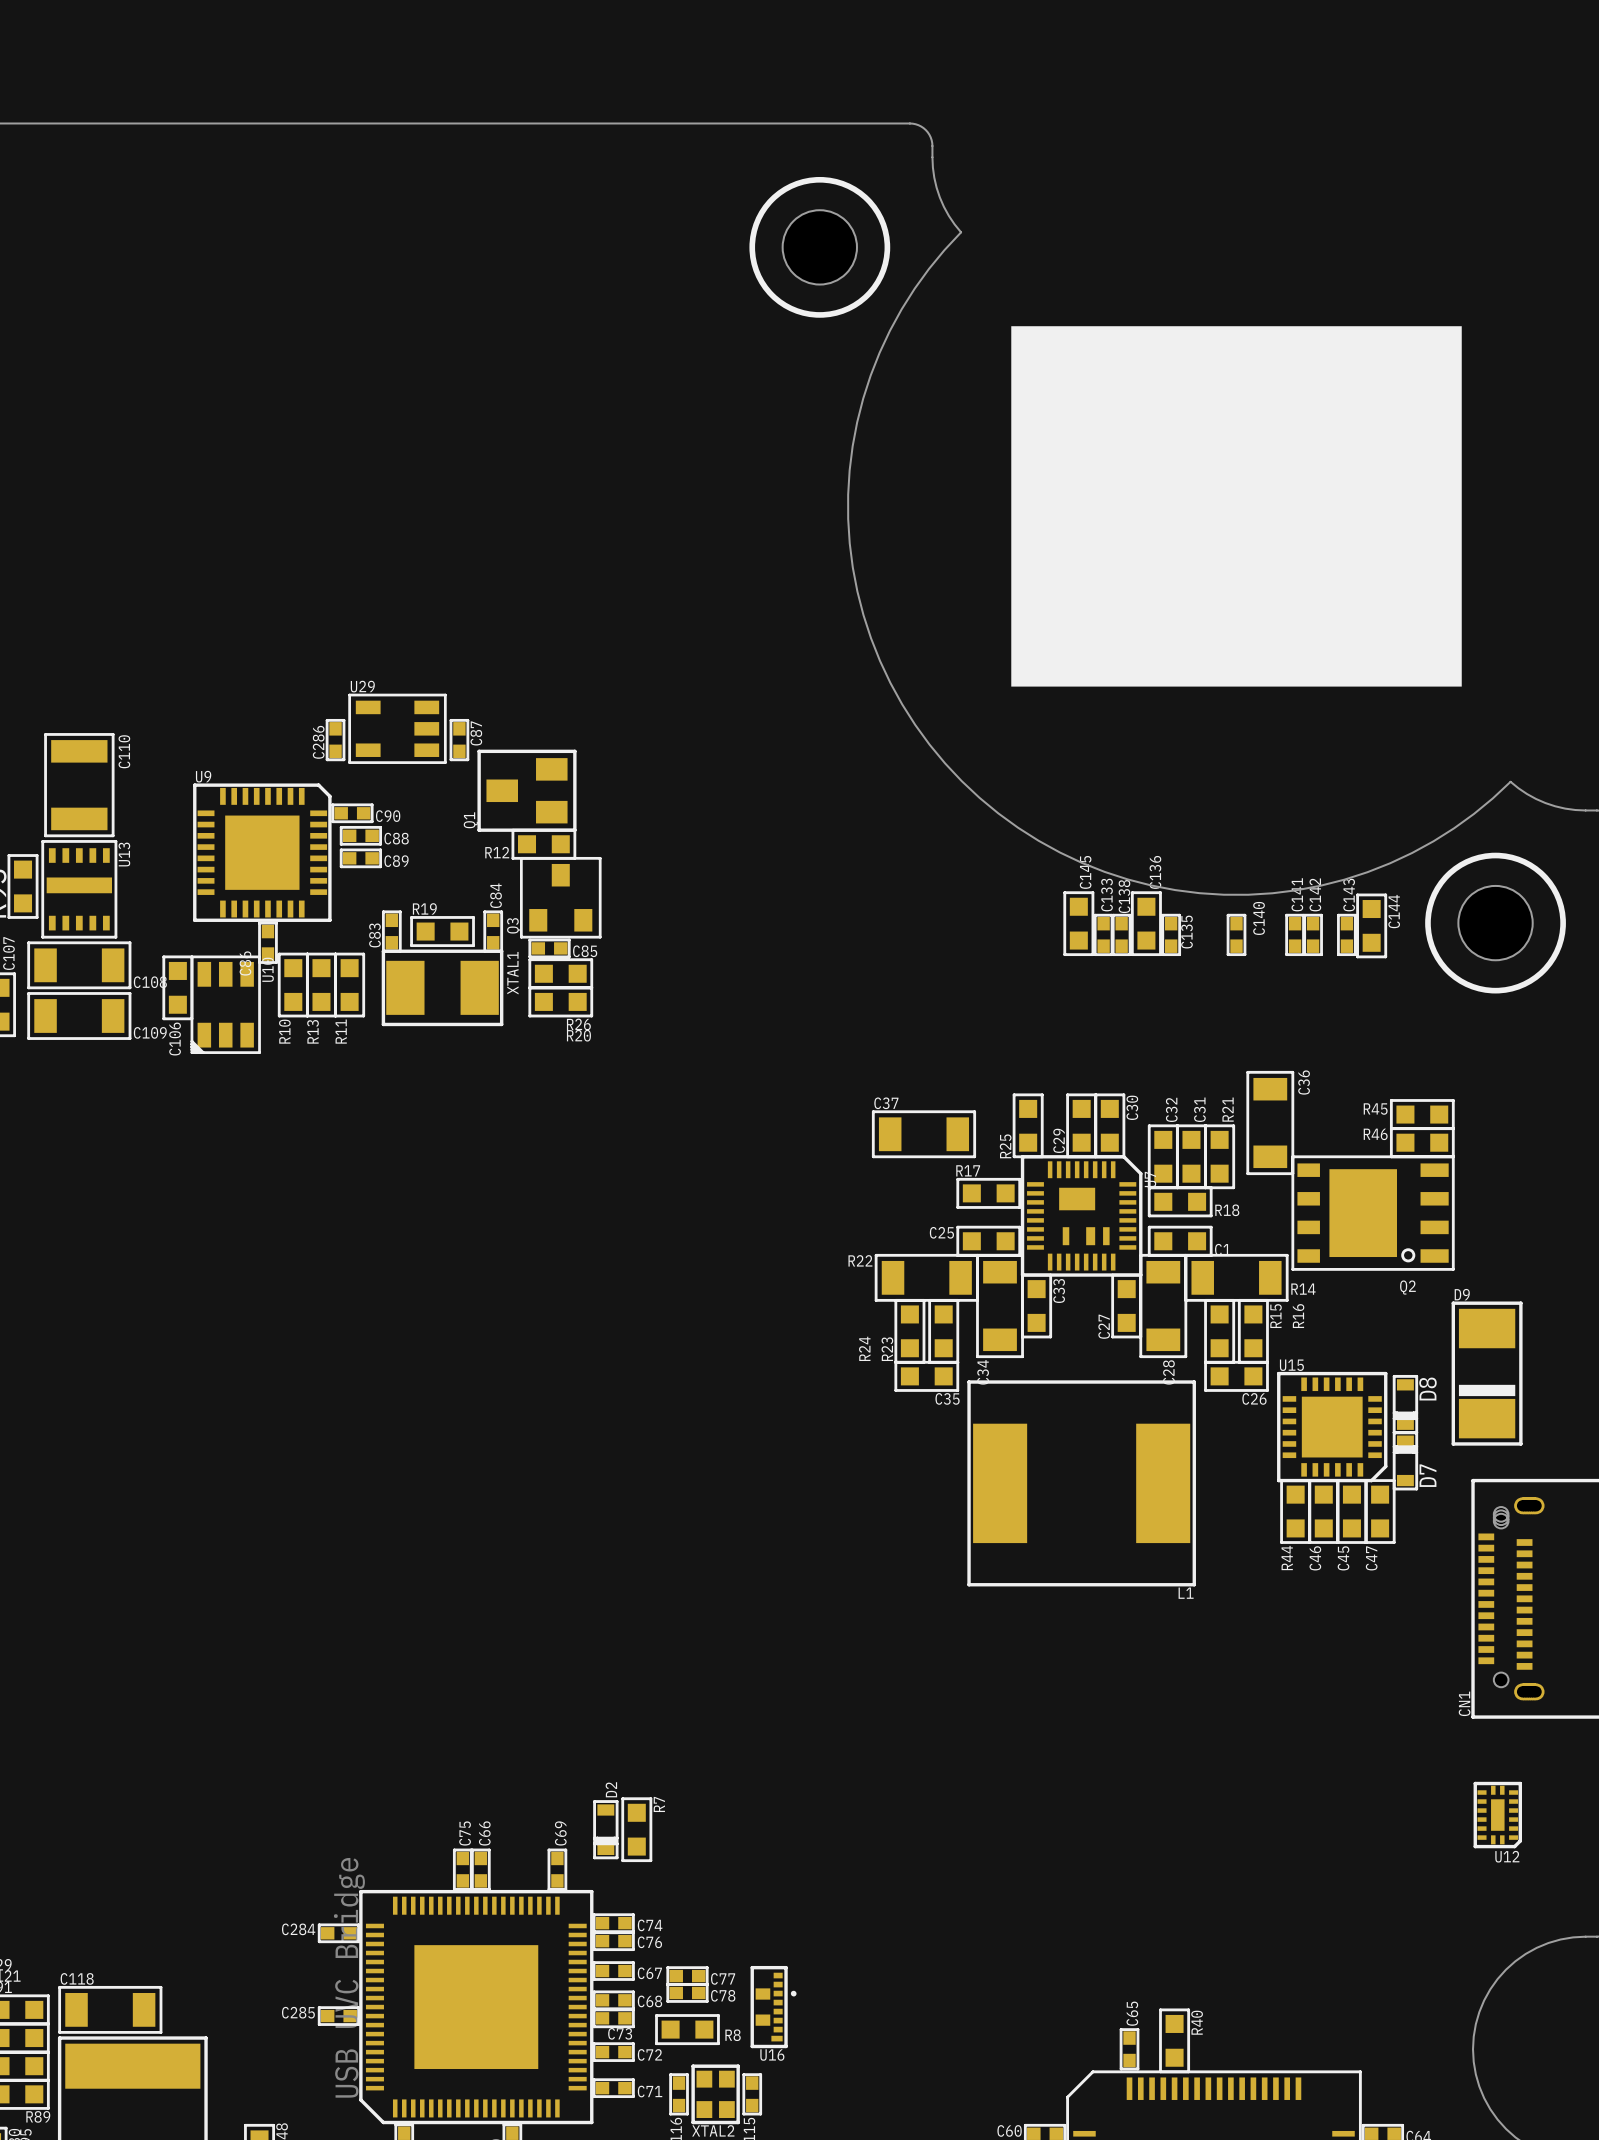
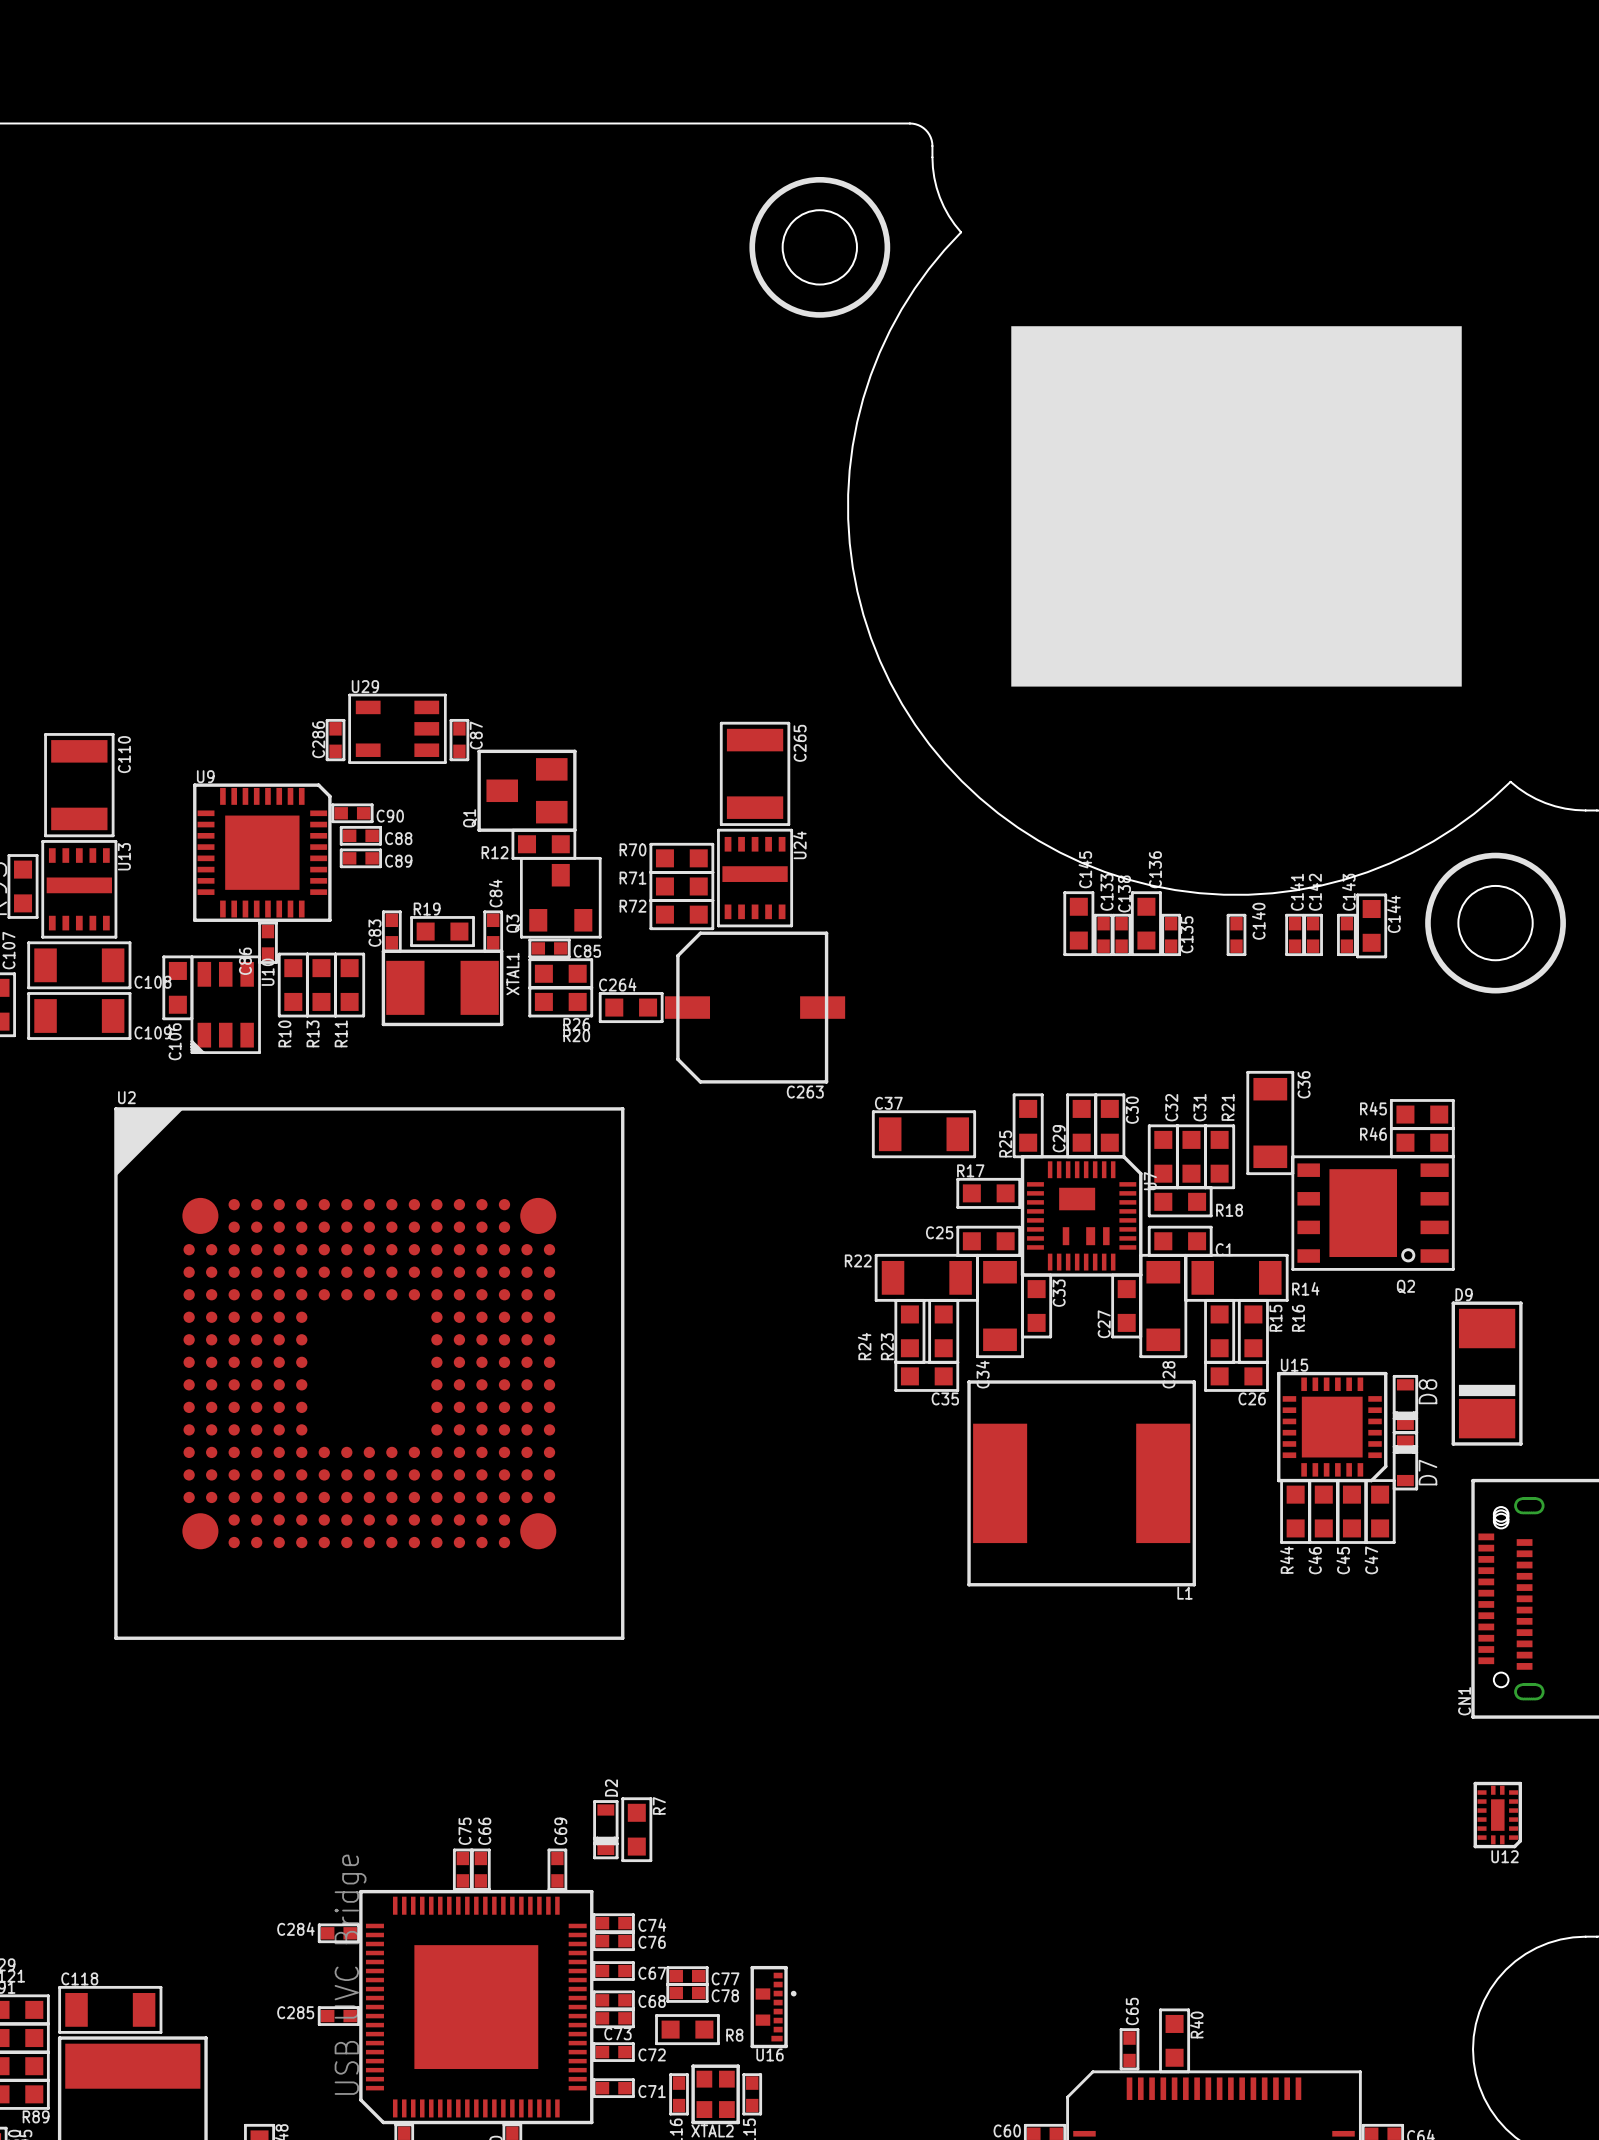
C265: none -> (755, 773)
R70: none -> (681, 858)
U24: none -> (755, 878)
R71: none -> (681, 886)
R72: none -> (681, 914)
C264: none -> (631, 1007)
C263: none -> (755, 1007)
U2: none -> (369, 1373)

